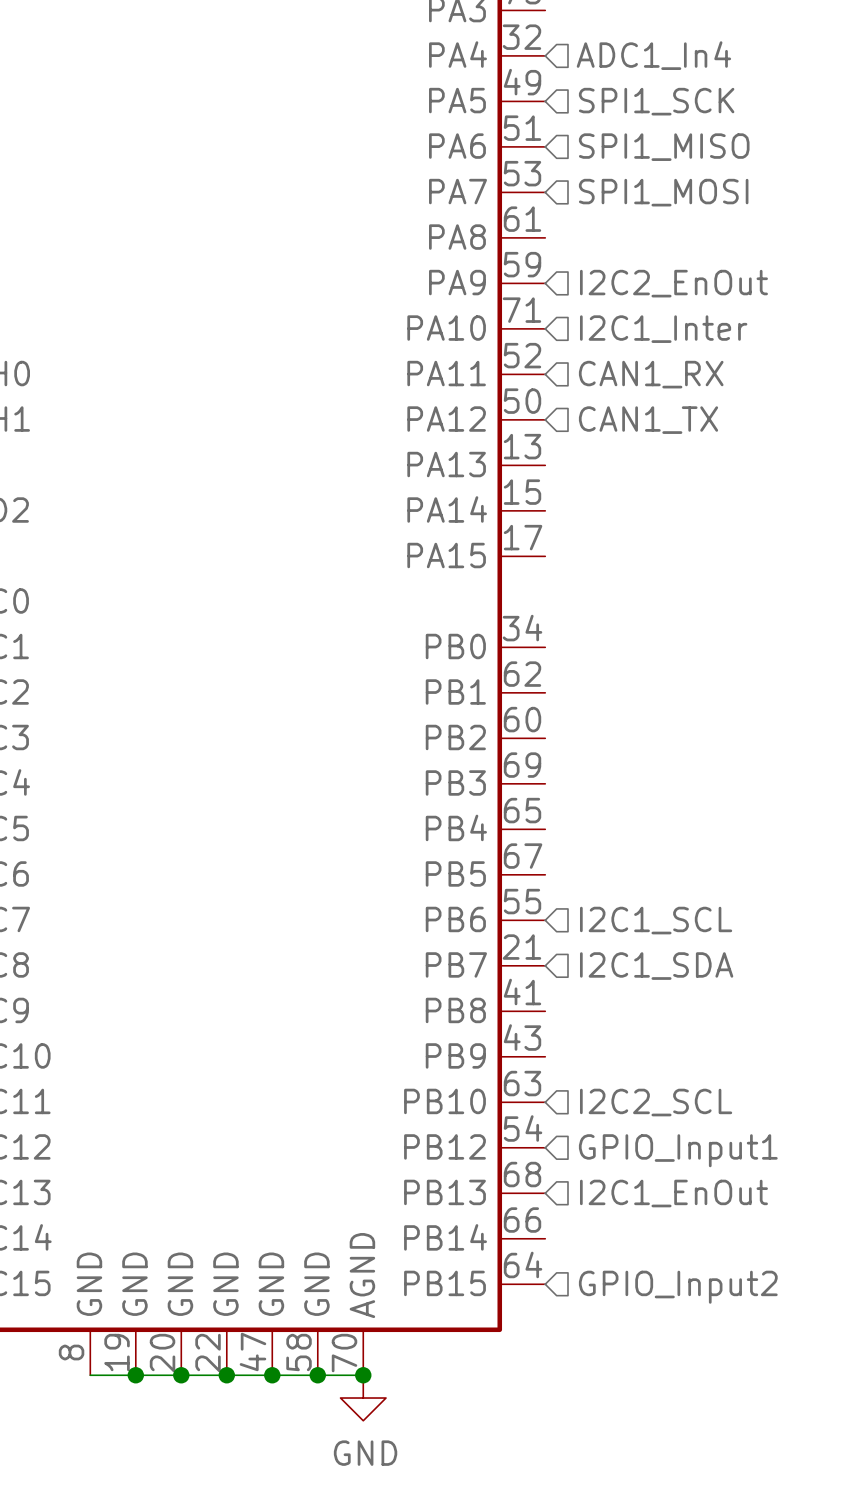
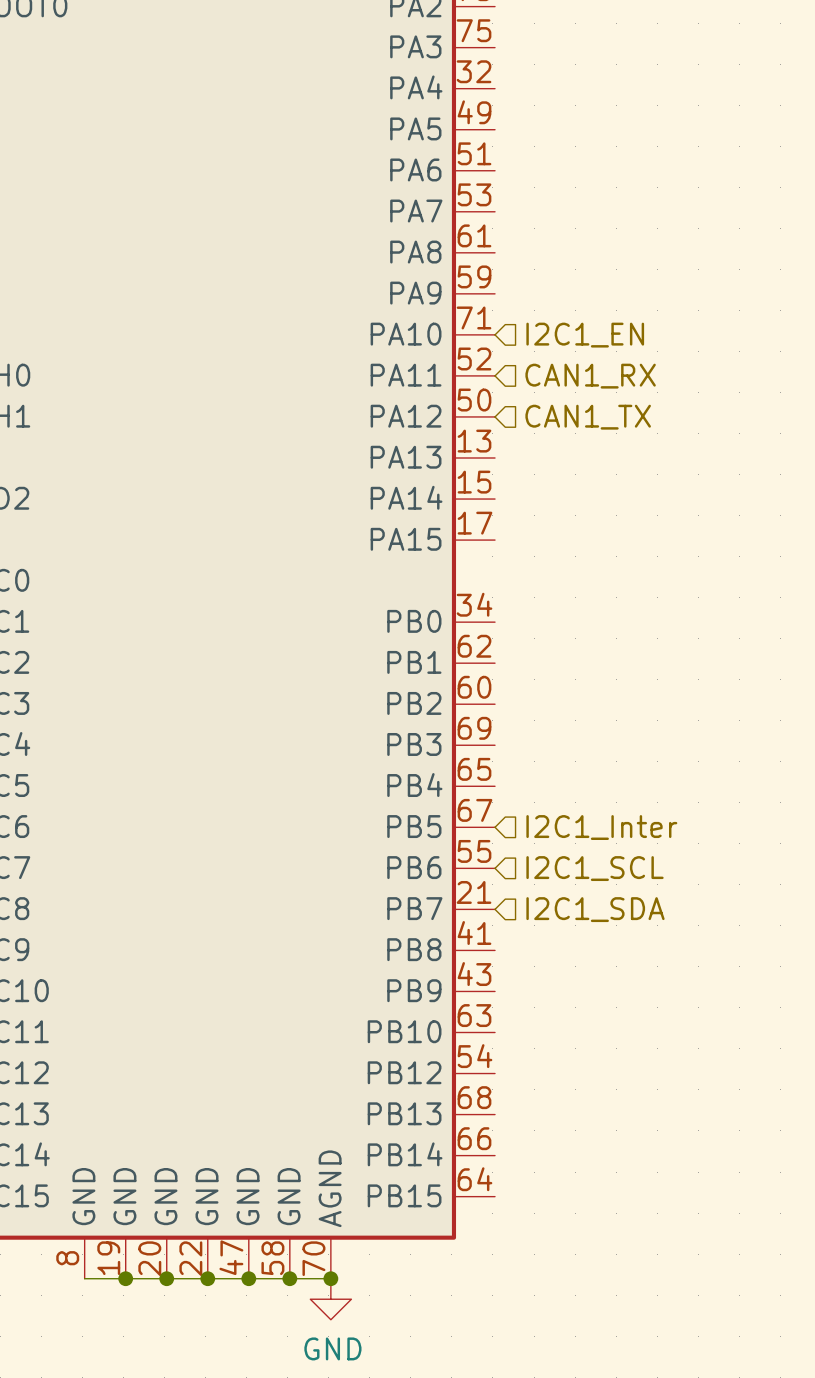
hierarchical label: ADC1_In4 (653, 55) -> none
hierarchical label: SPI1_SCK (656, 101) -> none
hierarchical label: SPI1_MISO (664, 147) -> none
hierarchical label: SPI1_MOSI (663, 192) -> none
hierarchical label: I2C2_EnOut (673, 283) -> none
hierarchical label: I2C1_Inter (663, 329) -> I2C1_EN (585, 335)
hierarchical label: none -> I2C1_Inter (601, 827)
hierarchical label: I2C2_SCL (656, 1102) -> none
hierarchical label: GPIO_Input1 (678, 1150) -> none
hierarchical label: I2C1_EnOut (673, 1193) -> none
hierarchical label: GPIO_Input2 (678, 1287) -> none

